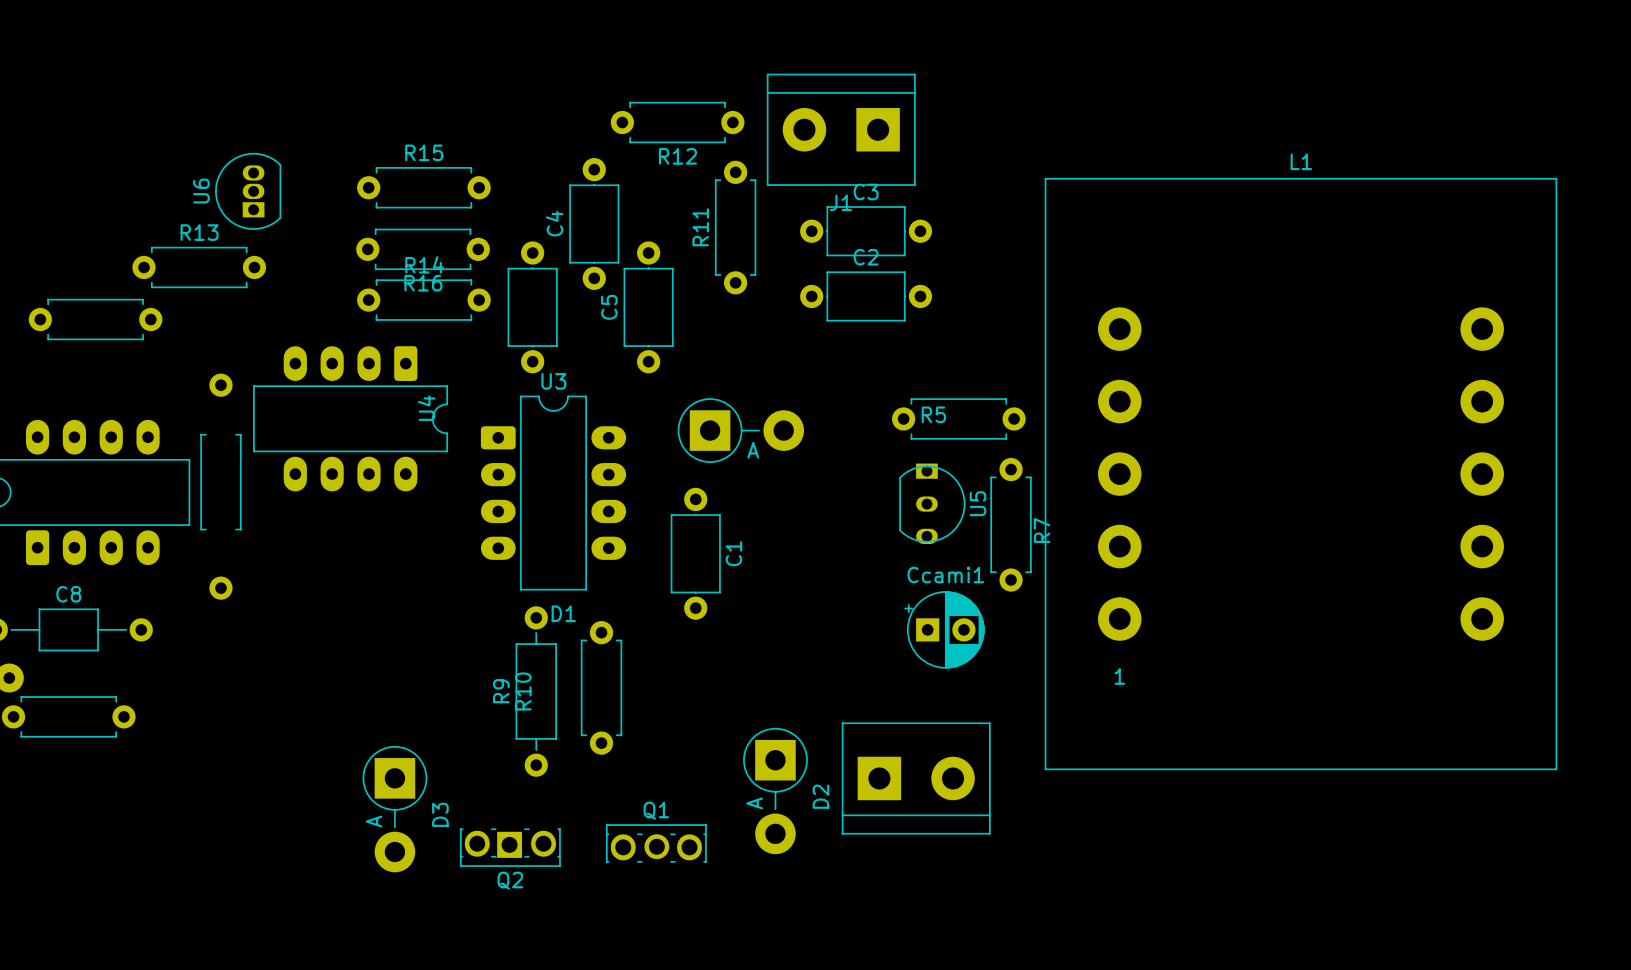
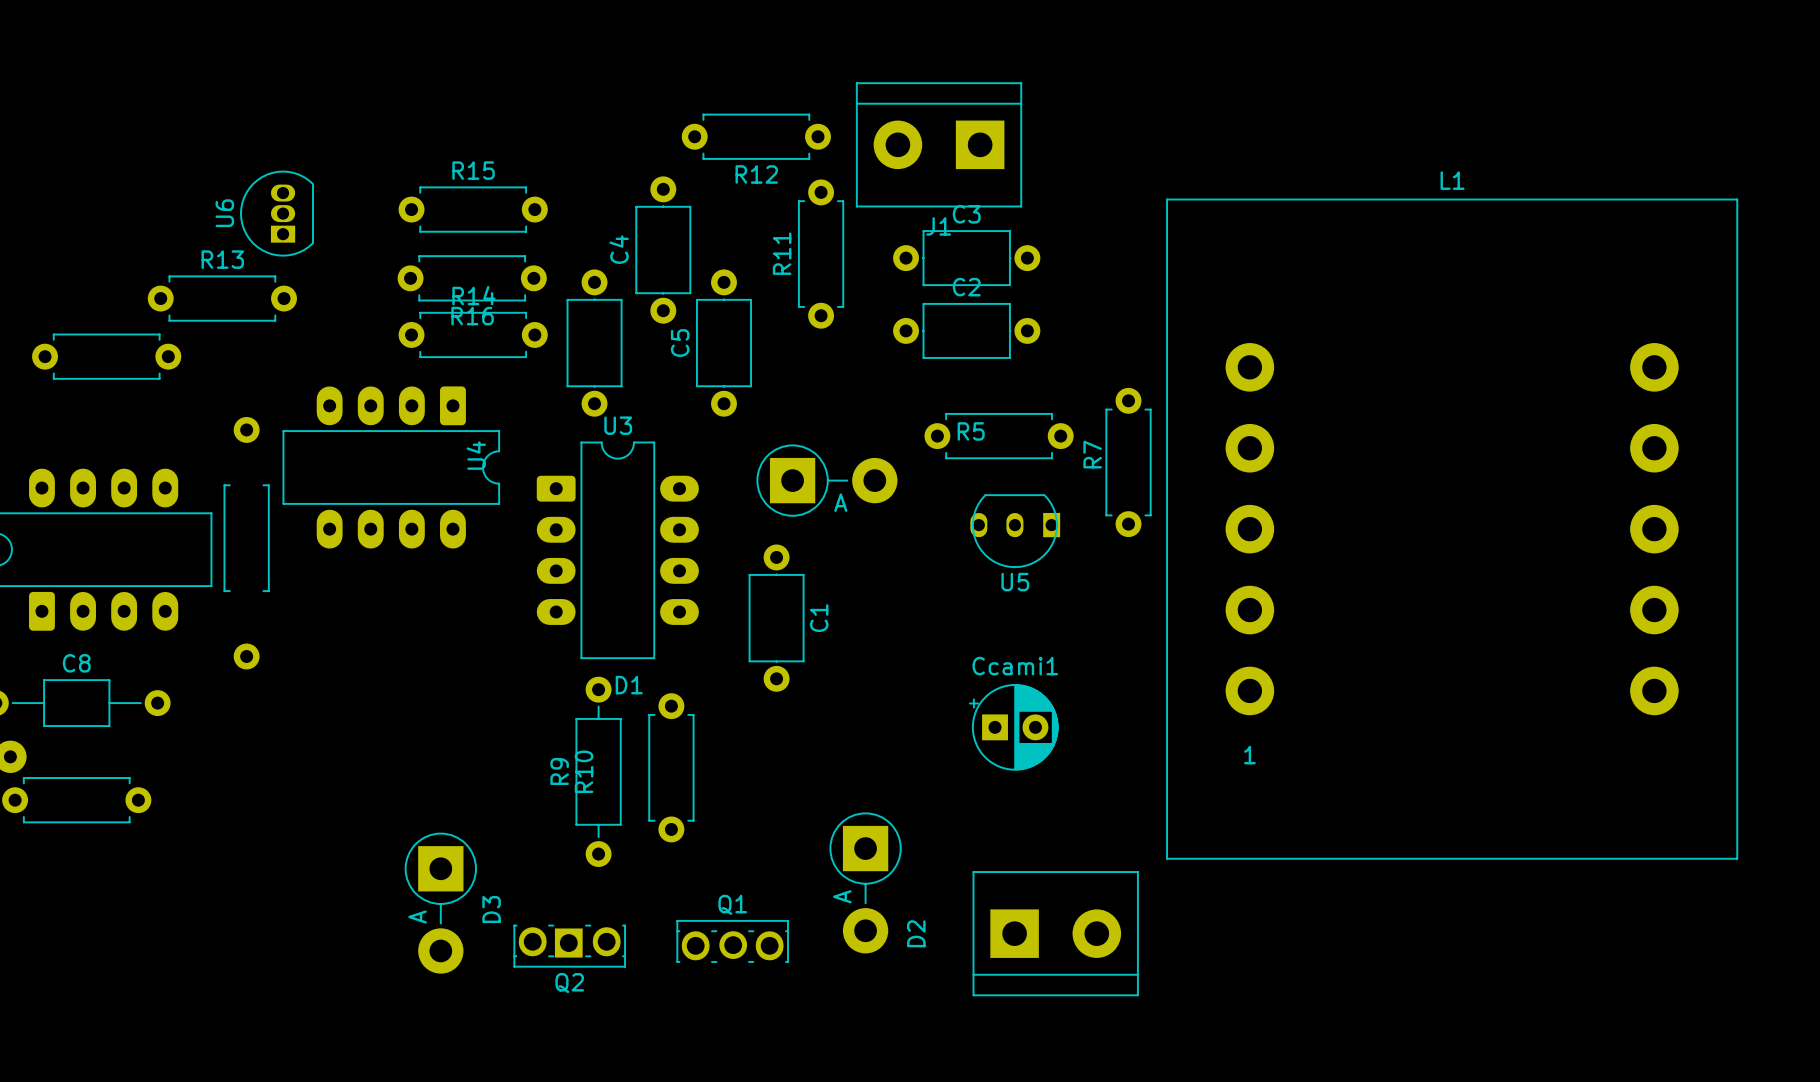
R5 position: (958, 418) -> (999, 436)
U5 rotation: 0° (932, 503) -> 90° clockwise (1015, 531)
R7 position: (1011, 524) -> (1128, 462)
R7 name position: R7 (1042, 530) -> R7 (1092, 454)
Ccami1 position: (944, 629) -> (1013, 727)
part position: (916, 778) -> (1055, 933)
D2 name position: D2 (820, 796) -> D2 (916, 933)

